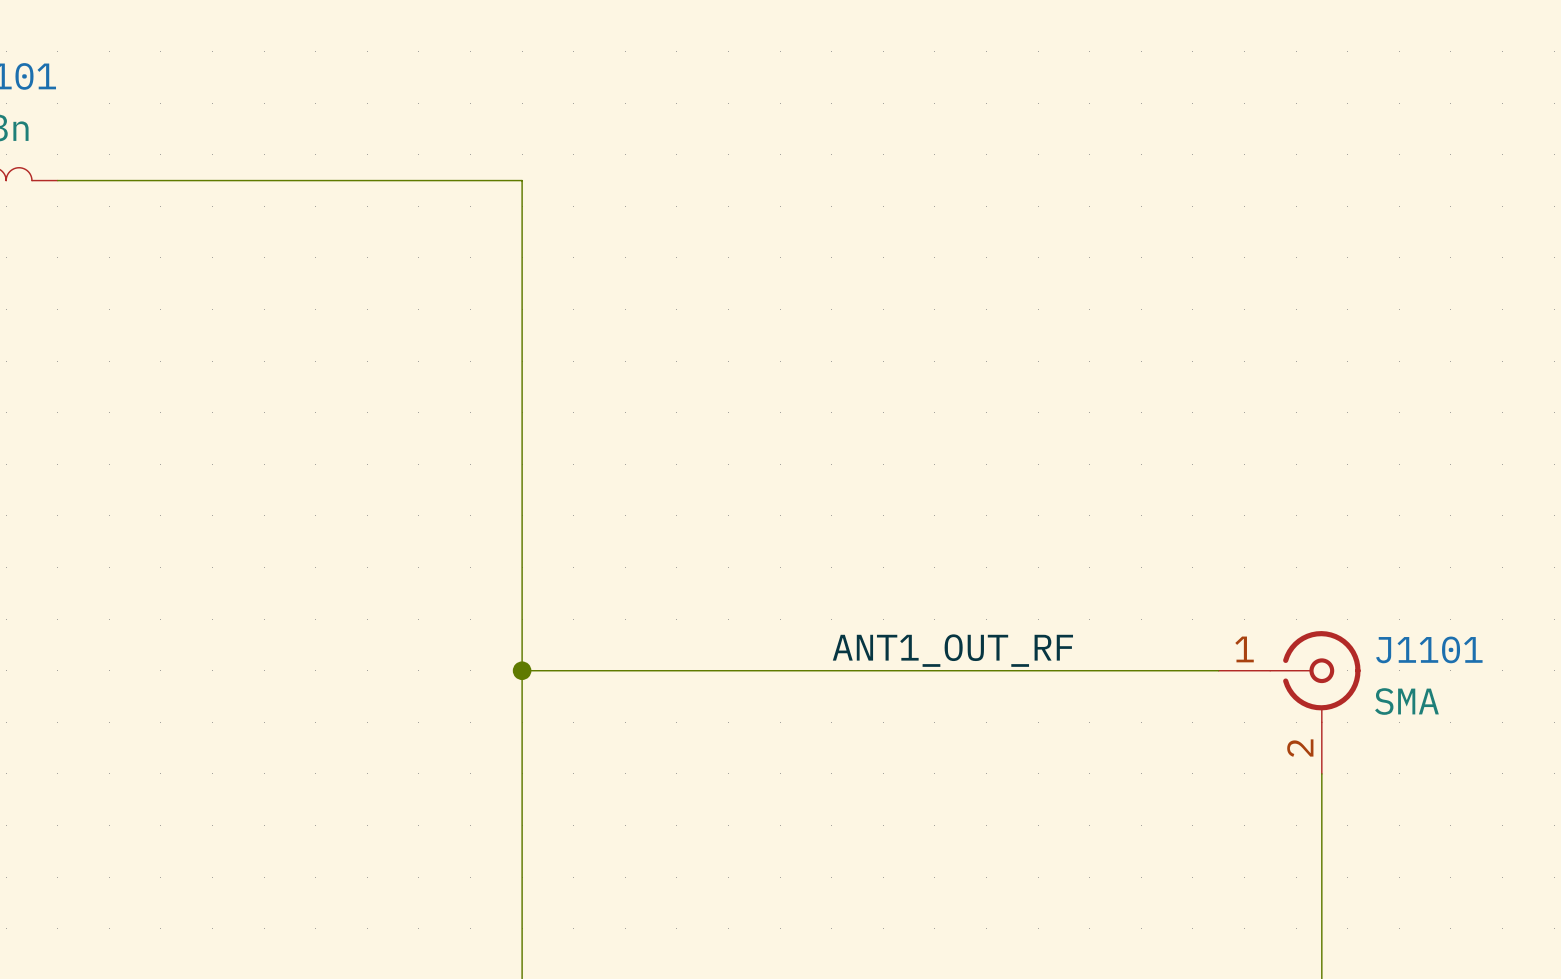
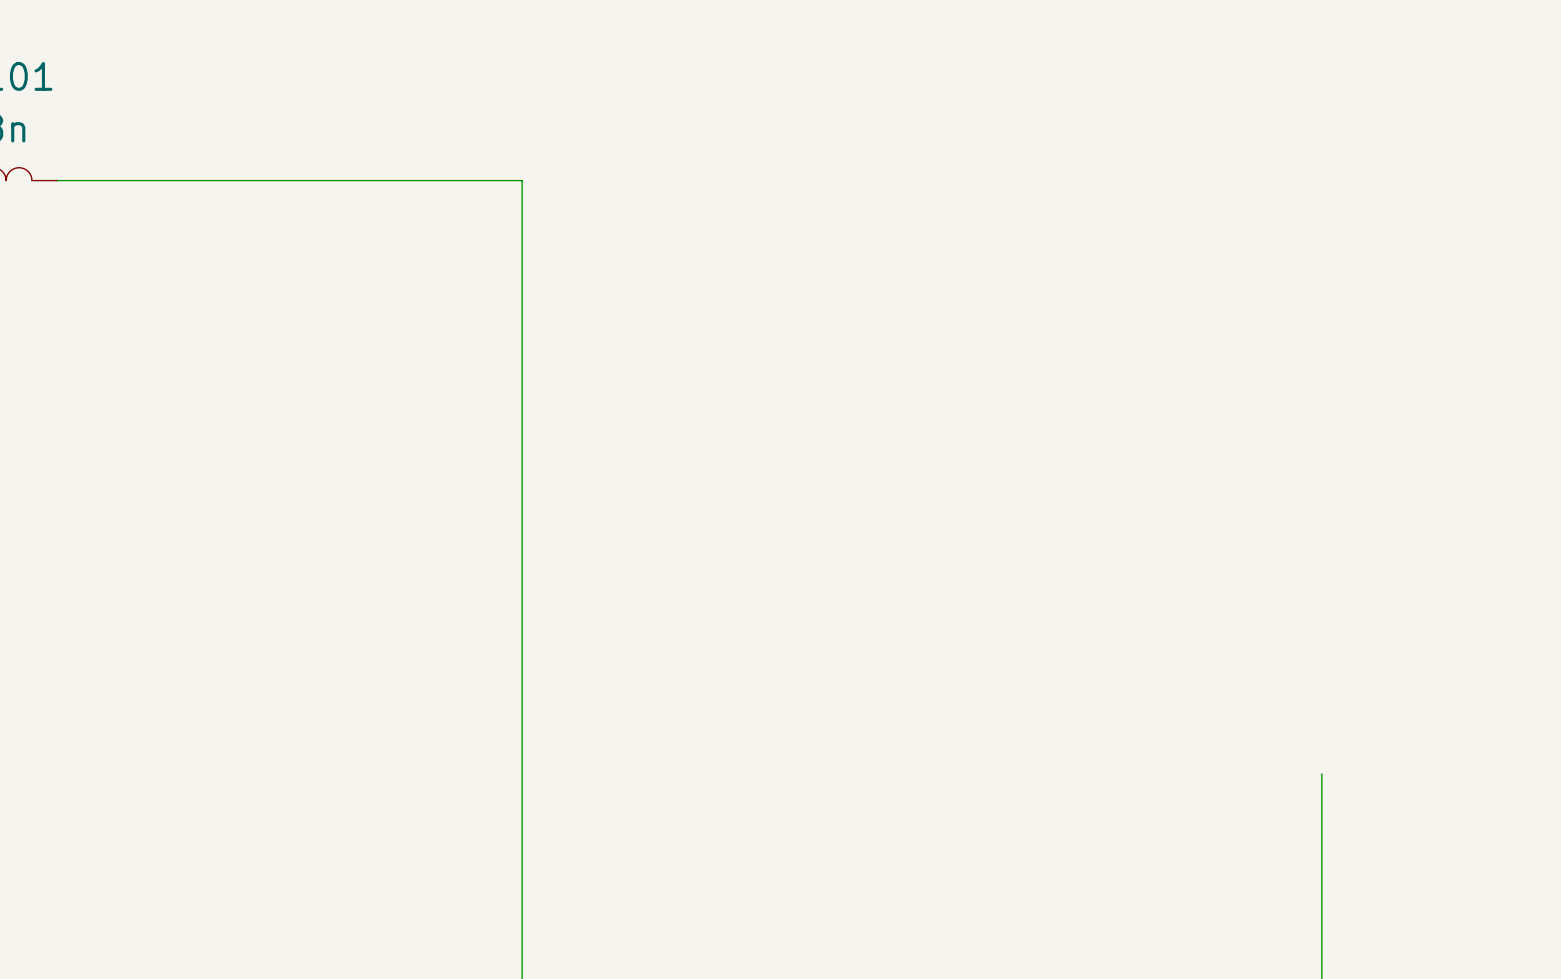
label: ANT1_OUT_RF (952, 650) -> none
wire: (522, 670) (1218, 670) -> none
junction: (522, 670) -> none
J1101: SMA (1289, 702) -> none

